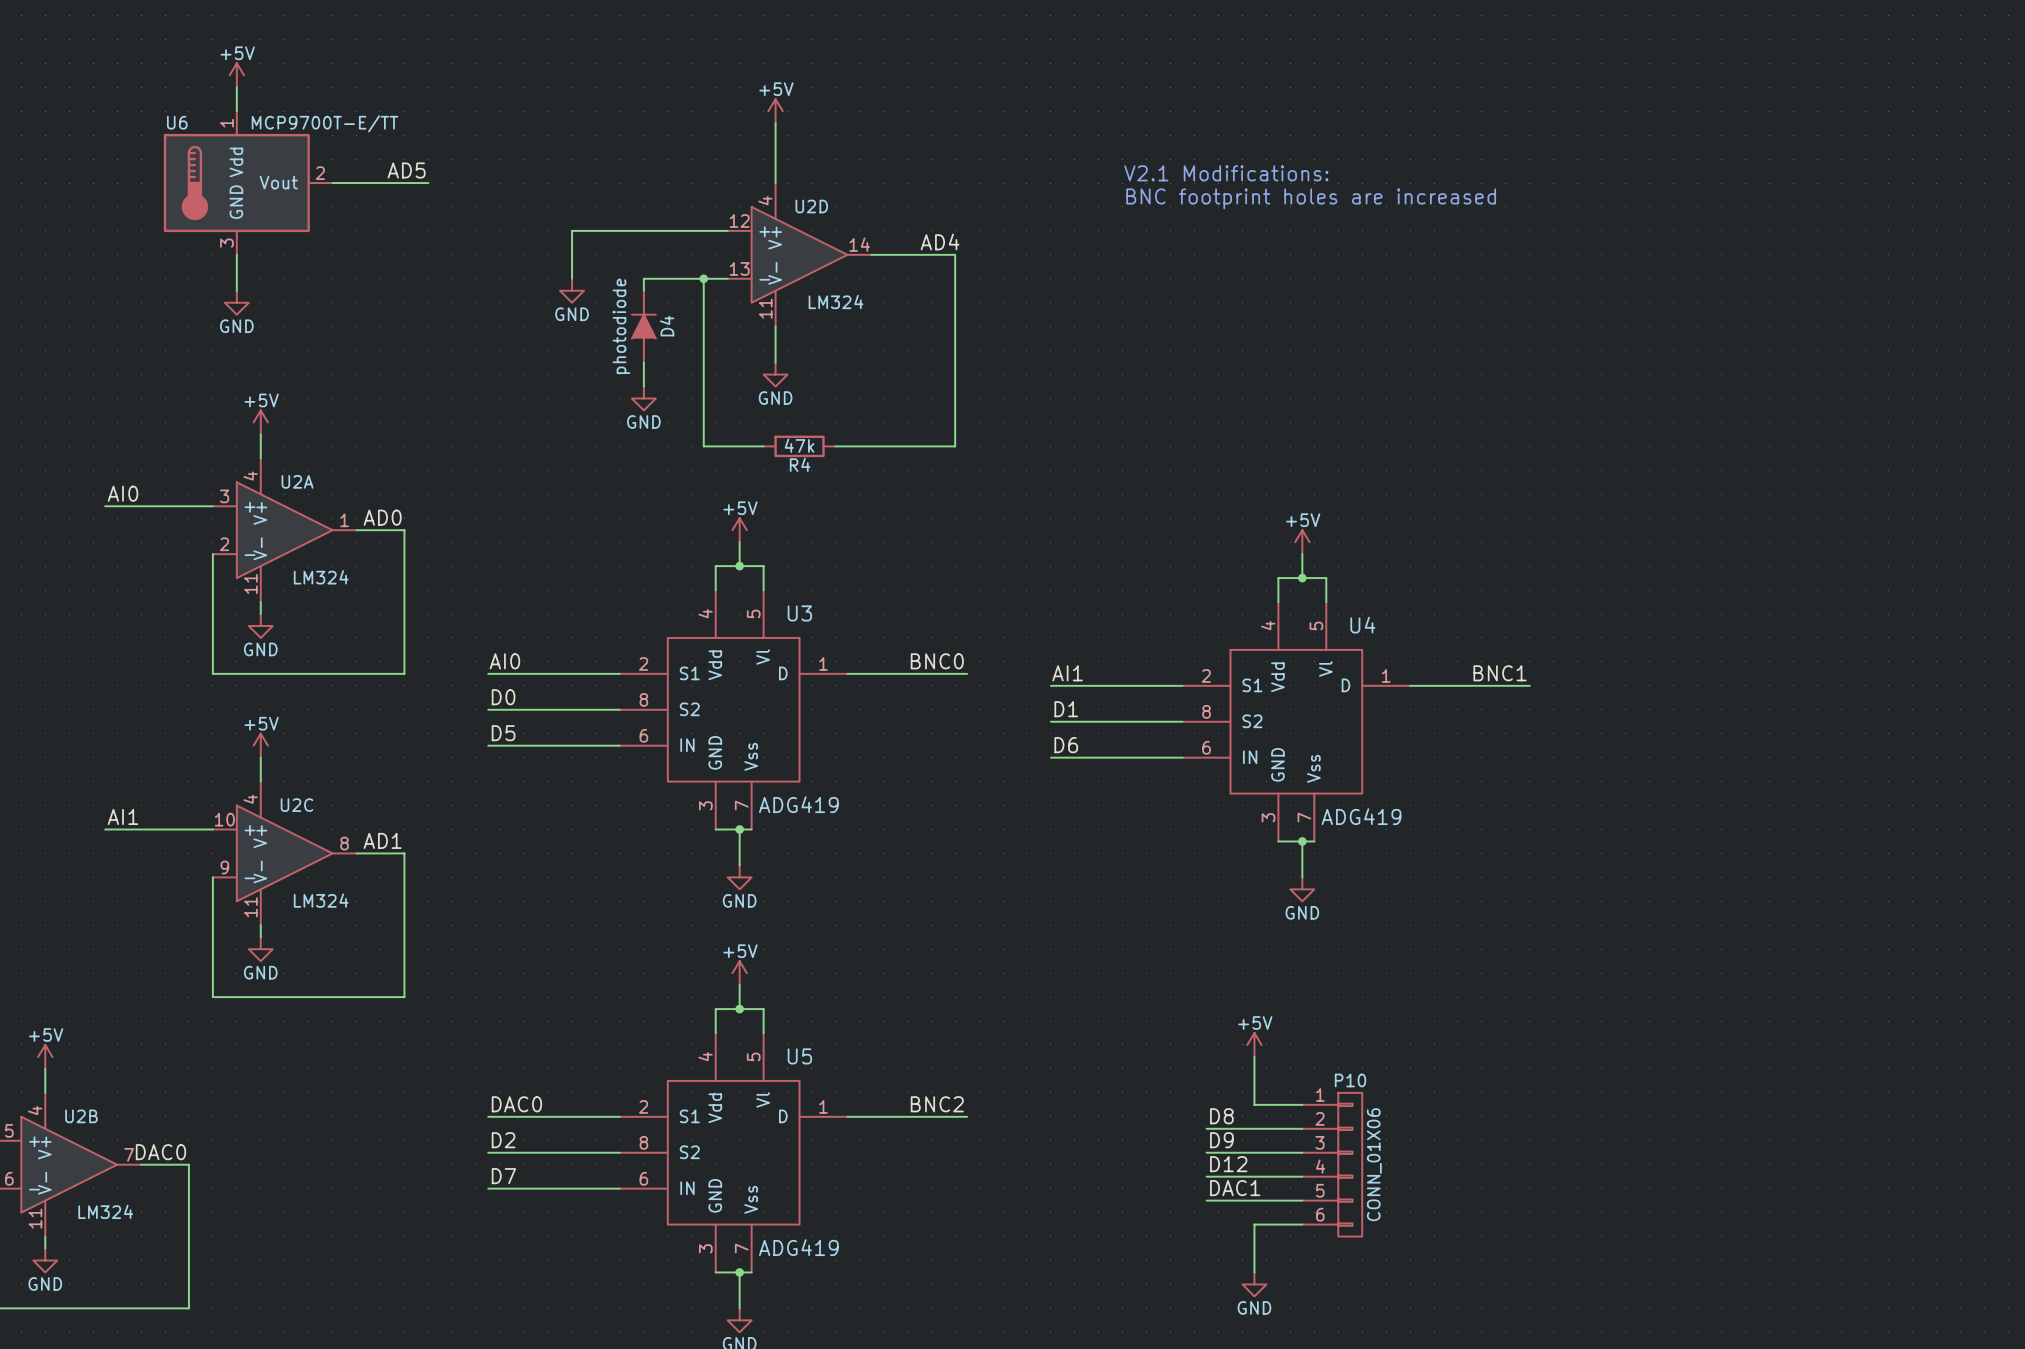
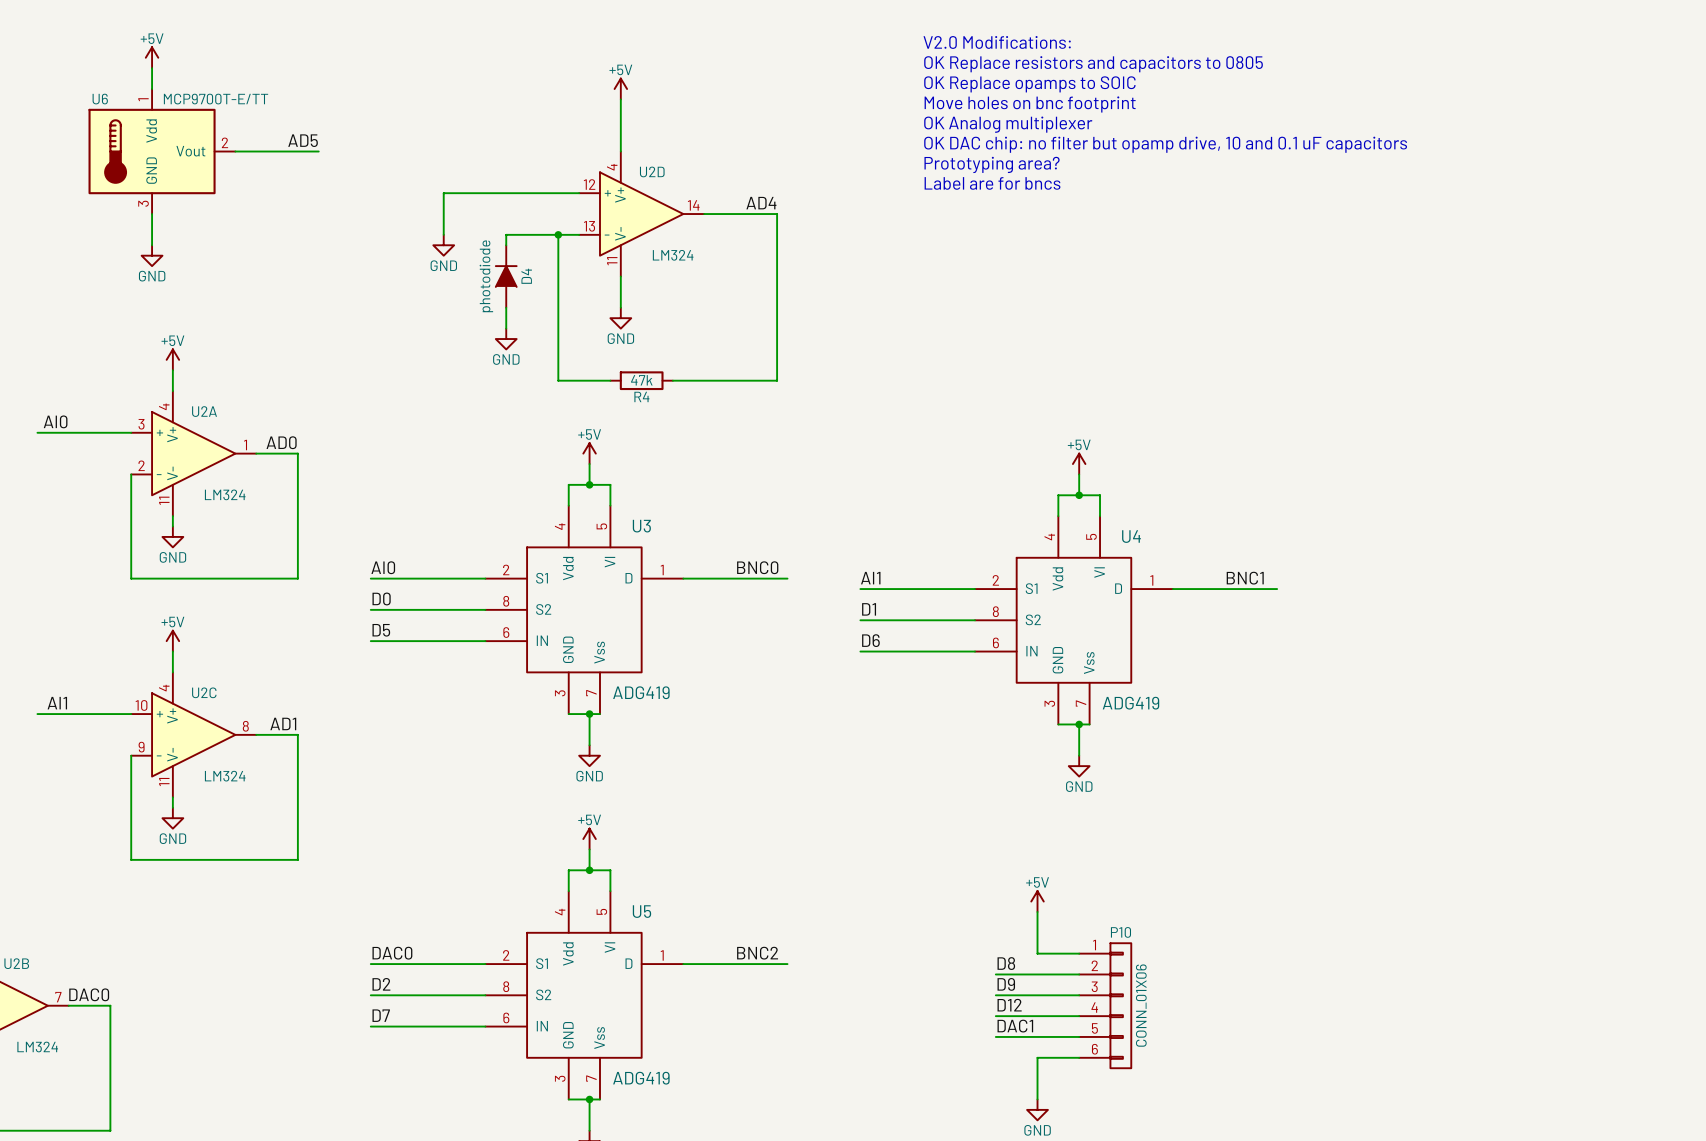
text: none -> V2.0 Modifications: (997, 42)
text: none -> OK Replace resistors and capacitors to 0805 (1093, 64)
text: none -> OK Replace opamps to SOIC (1029, 84)
text: none -> Move holes on bnc footprint (1030, 104)
text: none -> OK Analog multiplexer (1008, 124)
text: V2.1 Modifications: (1226, 173) -> OK DAC chip: no filter but opamp drive, 10 and 0.1 uF capacitors (1165, 144)
text: BNC footprint holes are increased (1311, 198) -> Prototyping area? (992, 164)
text: none -> Label are for bncs (992, 183)

